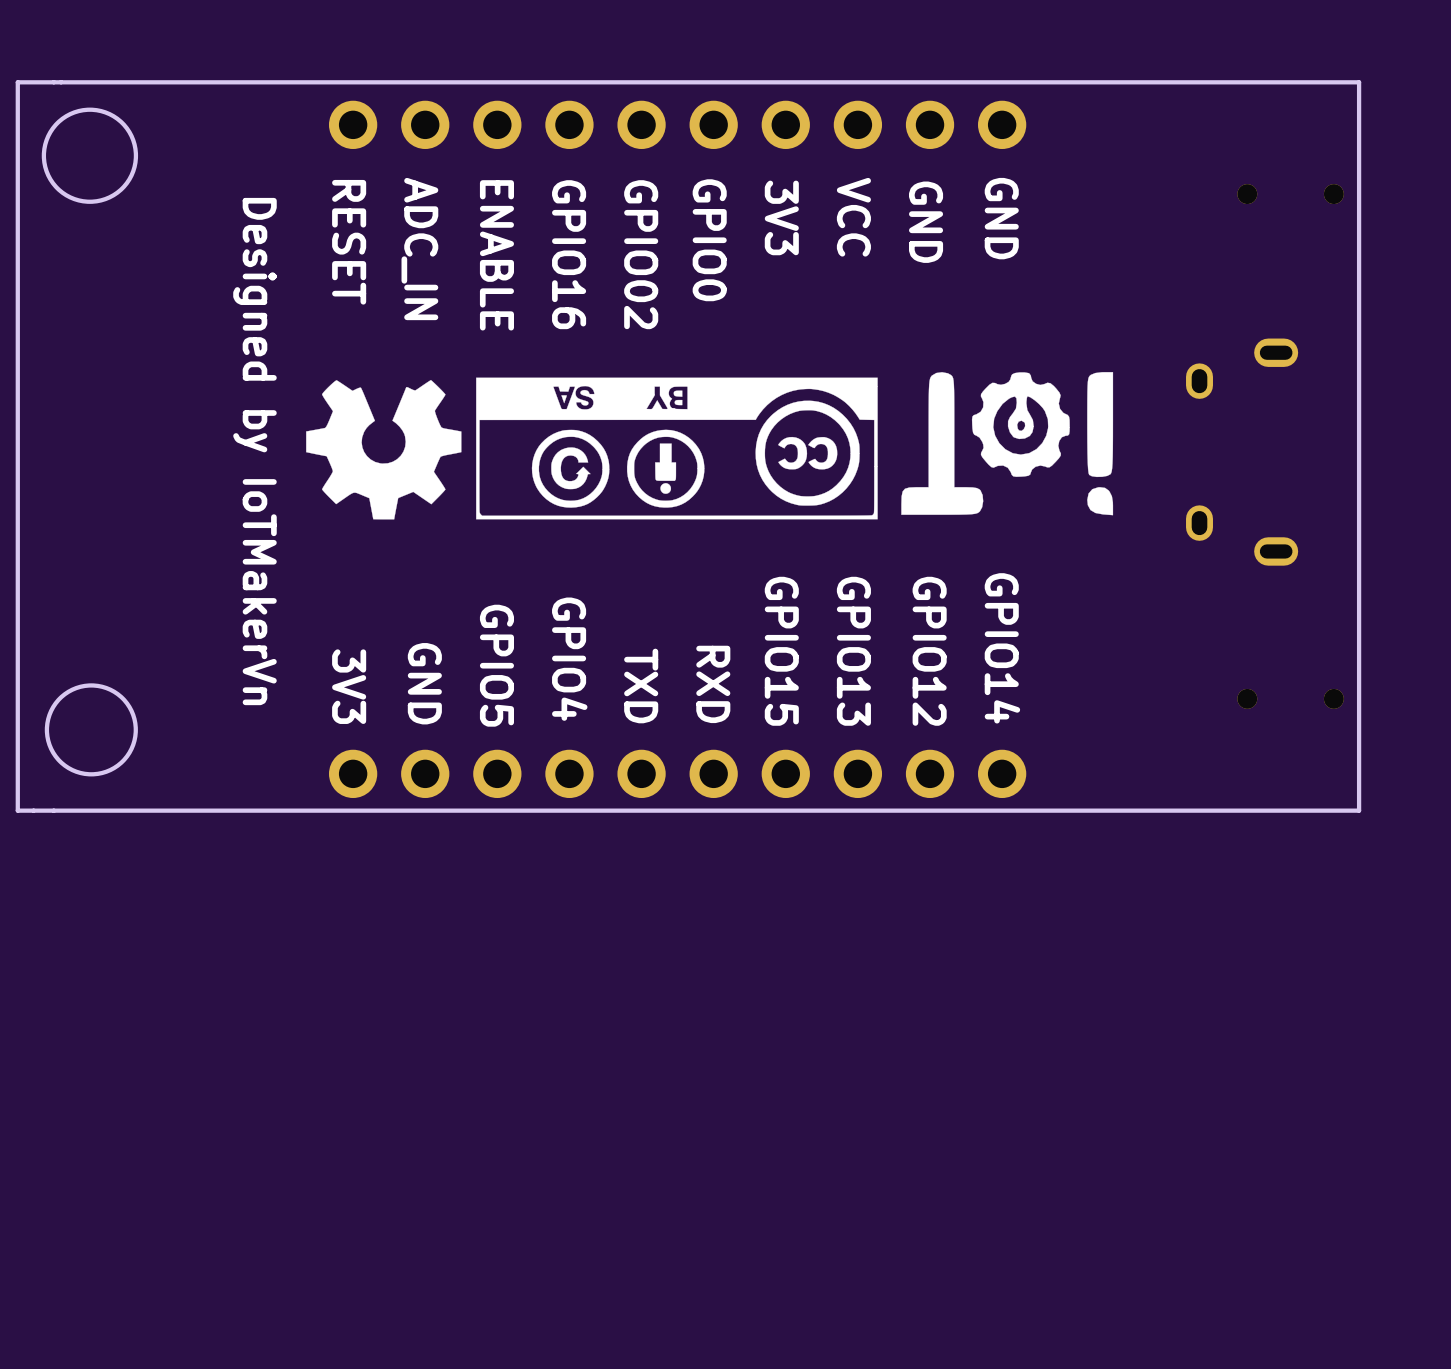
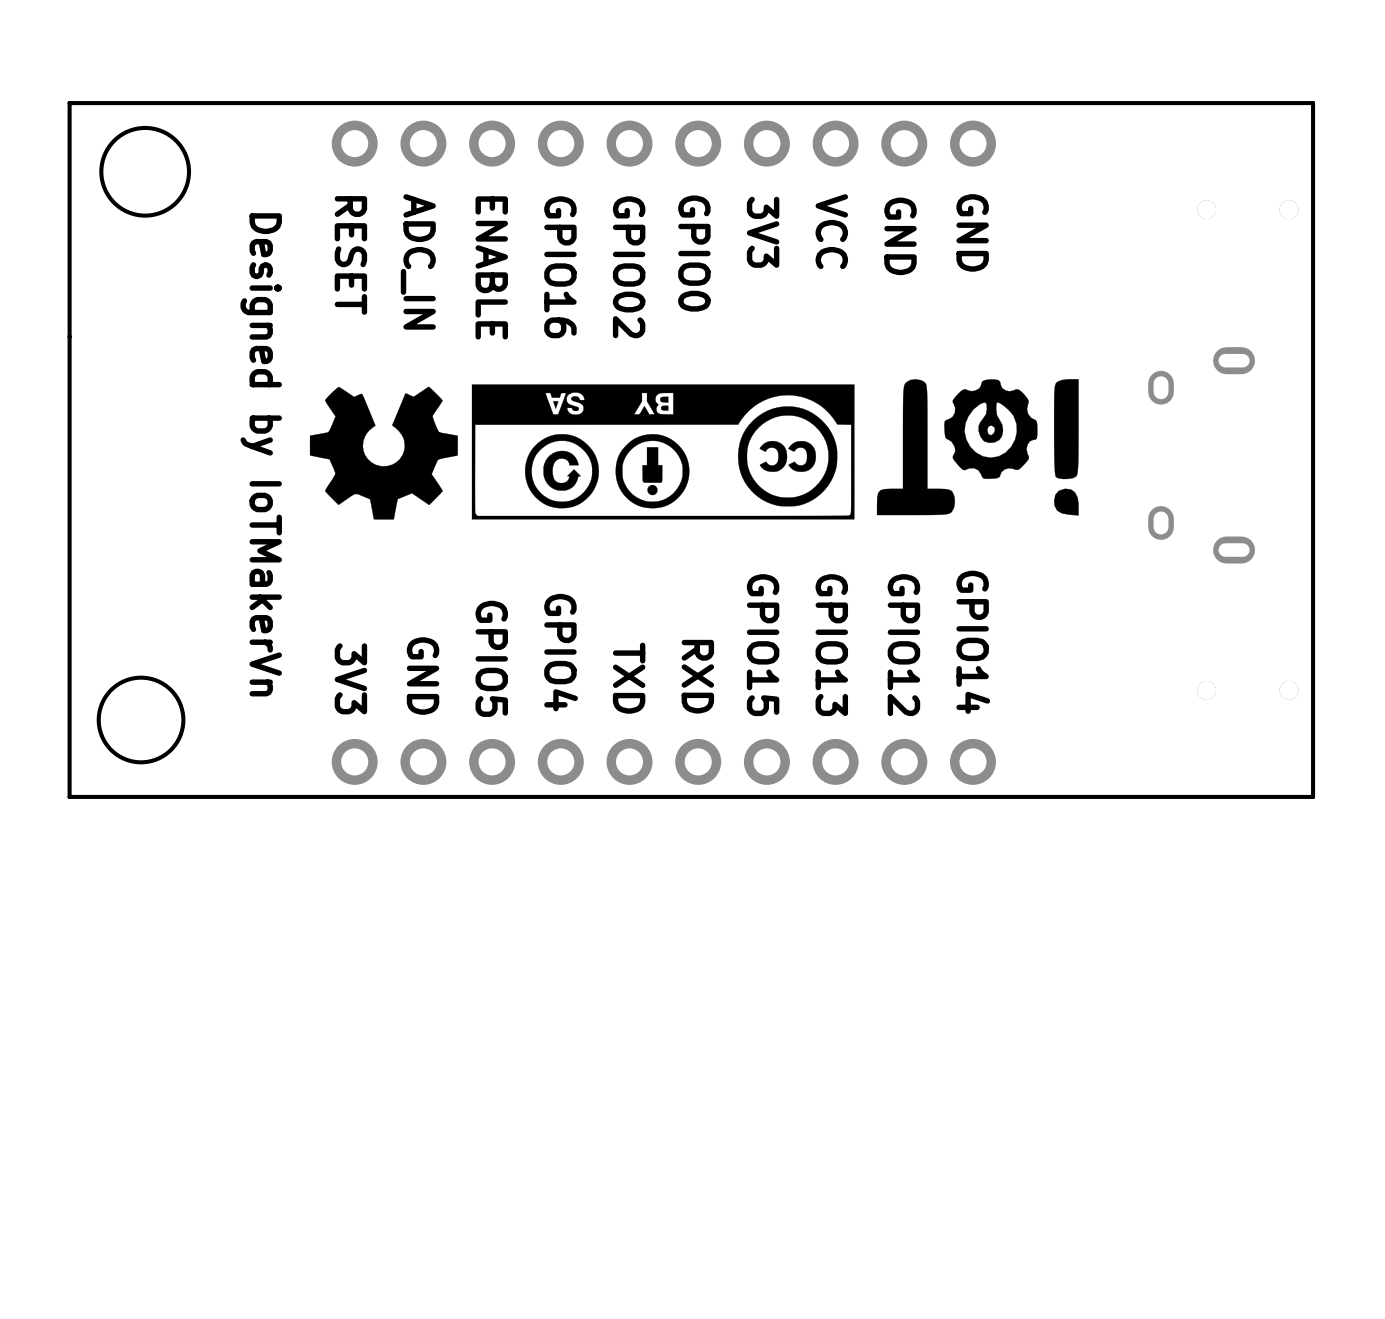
board edge: (53, 82) (17, 82) (17, 810) (53, 810) -> (69, 103) (69, 796)
round board edge position: (89, 155) -> (145, 171)
round board edge position: (91, 729) -> (141, 720)

